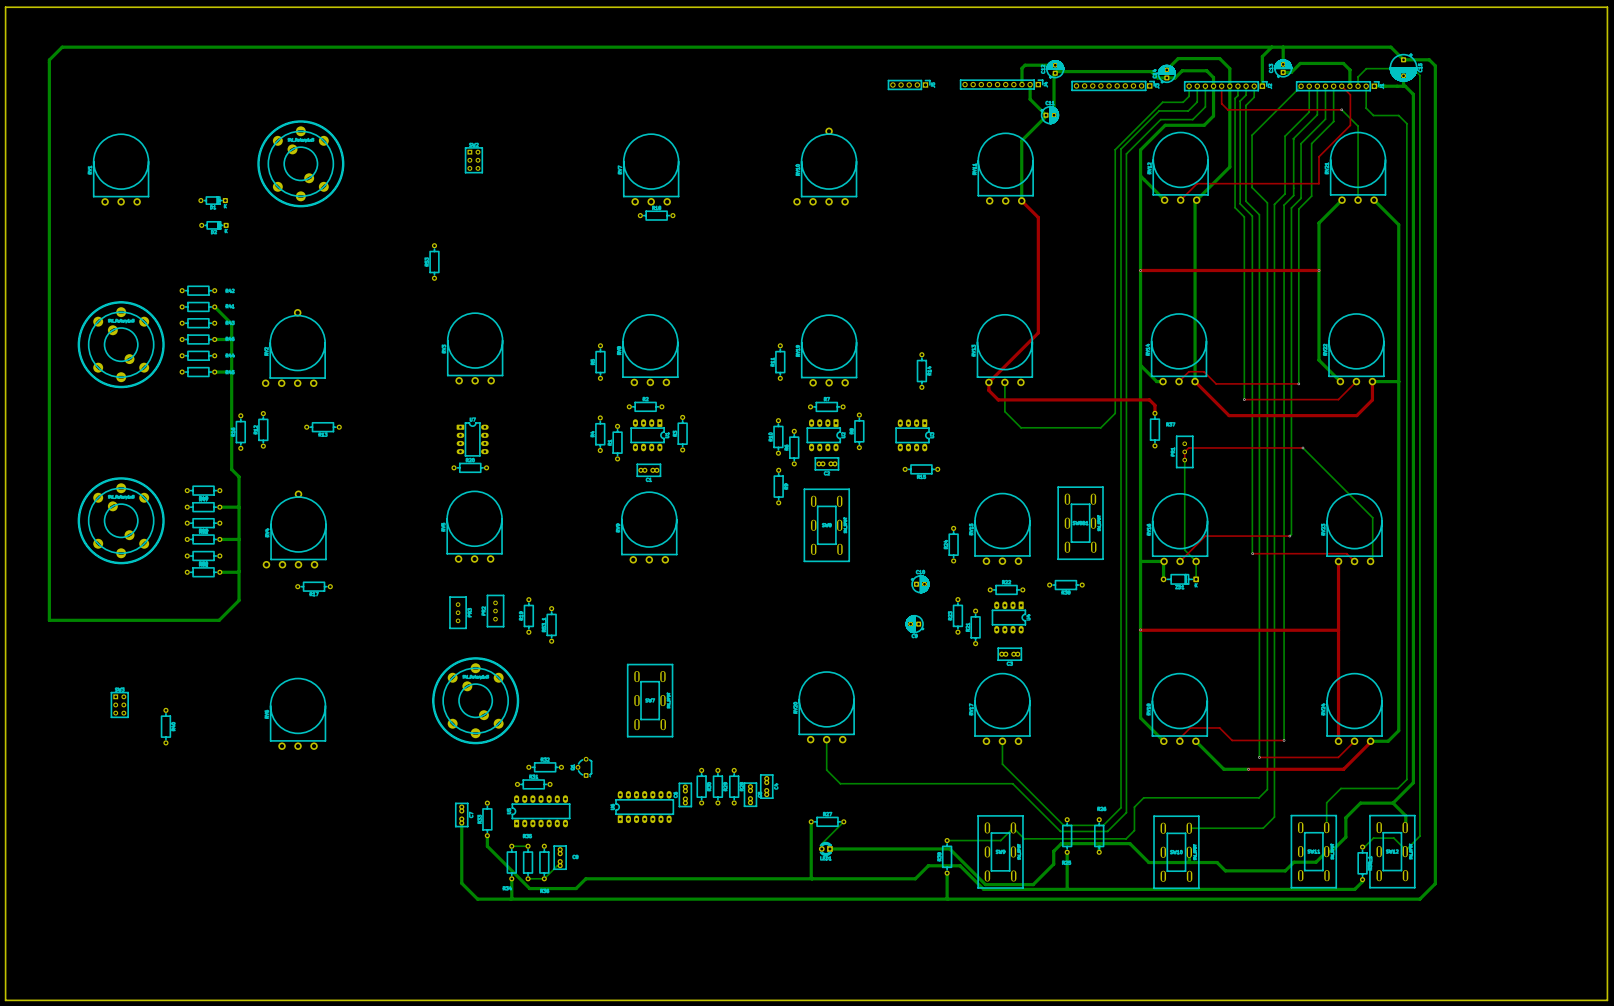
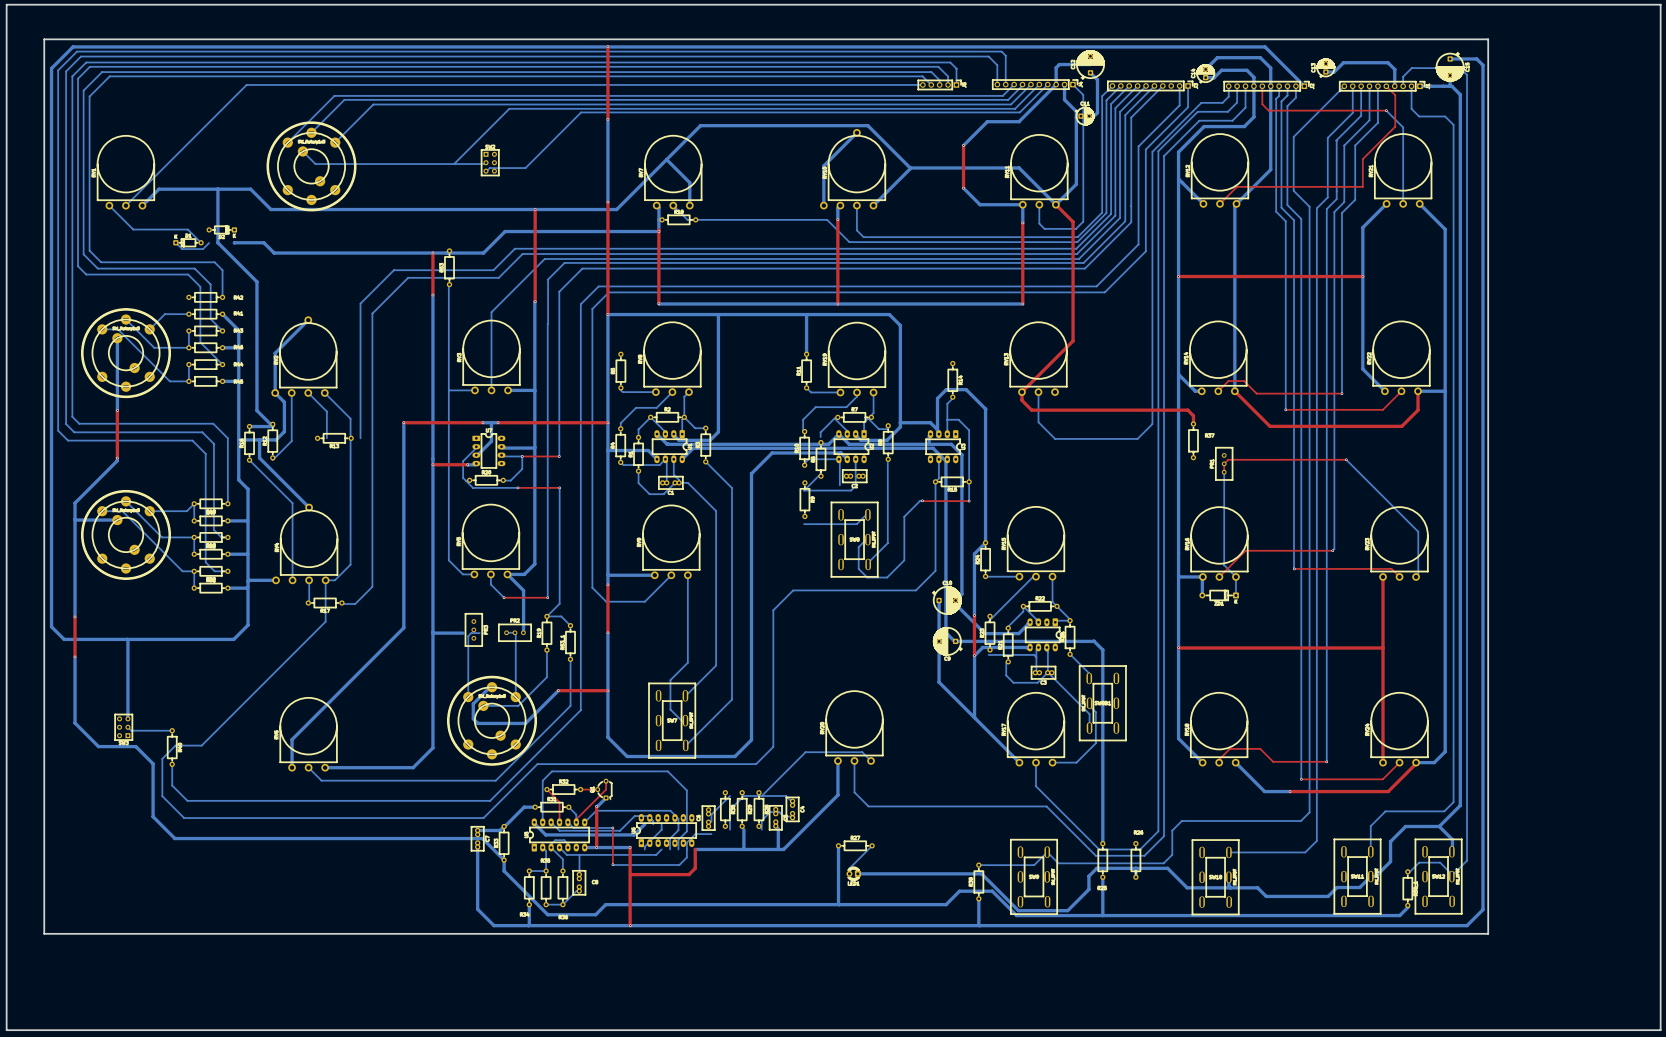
board edge: none -> (44, 39) (1488, 39) (1488, 933) (44, 933) (44, 39)
top track: none -> (607, 46) (607, 119)
via: none -> (607, 46)
bottom track: (1271, 47) (1262, 56) (1262, 86) -> none
bottom track: (1283, 47) (1283, 64) -> none
bottom track: (1403, 59) (1390, 47) (62, 47) (49, 60) (49, 620) (219, 620) (239, 600) (239, 476) (231, 469) (230, 322) -> (1304, 86) (1265, 46) (73, 46) (51, 68) (51, 626) (64, 639) (233, 639) (248, 625) (248, 489) (238, 479) (238, 330)
part footprint: [1046, 60, 1064, 79] -> [1076, 50, 1105, 80]
bottom track: none -> (1090, 72) (1097, 79) (1097, 112) (1092, 117)
bottom track: (1166, 77) (1157, 77) (1151, 71) (1056, 71) (1054, 74) (1054, 115) -> none
bottom track: none -> (922, 84) (246, 84) (125, 205)
bottom track: none -> (931, 84) (922, 76) (109, 76) (89, 96) (89, 250) (101, 262) (214, 262) (222, 270) (222, 297)
bottom track: none -> (939, 84) (939, 80) (931, 72) (102, 72) (83, 90) (83, 254) (97, 268) (194, 268) (210, 284) (210, 319) (222, 330)
bottom track: none -> (948, 84) (948, 76) (938, 66) (89, 66) (77, 78) (77, 266) (86, 274) (188, 274) (200, 286) (200, 342) (222, 364)
bottom track: none -> (956, 84) (956, 68) (950, 62) (86, 62) (72, 76) (72, 416) (79, 423) (213, 423) (227, 438) (227, 503)
bottom track: none -> (997, 84) (997, 65) (988, 56) (80, 56) (66, 71) (66, 424) (74, 432) (202, 432) (214, 444) (213, 529) (221, 537) (227, 537)
bottom track: none -> (1005, 84) (1005, 55) (1001, 51) (77, 51) (58, 70) (58, 430) (68, 440) (192, 440) (205, 453) (205, 562) (214, 571) (227, 571)
bottom track: none -> (1014, 84) (1002, 95) (334, 95) (287, 142)
bottom track: none -> (1022, 84) (1008, 99) (344, 99) (311, 132)
bottom track: none -> (1030, 84) (1011, 104) (373, 104) (335, 142)
bottom track: none -> (1039, 84) (1015, 108) (509, 108) (454, 164)
bottom track: none -> (1047, 84) (1019, 112) (581, 112) (525, 168) (489, 168) (485, 172)
bottom track: none -> (1056, 84) (1019, 121) (987, 121) (963, 145)
bottom track: none -> (1072, 84) (1083, 94) (1083, 221) (1076, 228) (1044, 228) (1039, 223) (1039, 204)
bottom track: none -> (1112, 85) (1102, 96) (1102, 212) (1077, 237) (863, 237) (856, 230) (856, 205)
bottom track: none -> (1120, 85) (1106, 100) (1106, 213) (1077, 242) (849, 242) (827, 219) (687, 219) (673, 205)
bottom track: none -> (1129, 85) (1111, 104) (1111, 214) (1076, 248) (514, 248) (493, 270) (393, 270) (360, 303) (360, 438)
bottom track: none -> (1137, 85) (1115, 108) (1115, 215) (1077, 254) (522, 254) (498, 277) (408, 277) (372, 313) (372, 586) (355, 604) (342, 604)
bottom track: none -> (1146, 85) (1120, 111) (1120, 217) (1079, 258) (544, 258) (491, 312) (491, 390)
bottom track: none -> (1154, 85) (1125, 115) (1125, 221) (1083, 262) (564, 262) (548, 279) (547, 597)
bottom track: none -> (1162, 85) (1131, 117) (1131, 222) (1084, 268) (582, 268) (559, 291) (559, 456)
bottom track: none -> (1179, 85) (1179, 105) (1138, 146) (1138, 244) (1096, 286) (598, 286) (580, 304) (580, 710) (490, 800) (187, 800) (172, 785) (172, 764)
bottom track: none -> (1188, 85) (1188, 107)
bottom track: none -> (1188, 107) (1145, 149) (1145, 251) (1104, 292) (608, 292) (592, 308) (592, 587) (606, 601) (644, 601) (671, 575)
bottom track: (1041, 110) (1046, 116) (1021, 140) (1021, 200) -> (1076, 111) (1076, 184) (1055, 204) (1019, 167) (910, 167)
bottom track: none -> (607, 119) (607, 202)
via: none -> (607, 119)
bottom track: none -> (856, 132) (823, 165) (823, 205)
top track: none -> (963, 145) (963, 188)
via: none -> (963, 145)
bottom track: none -> (302, 151) (315, 164) (485, 164)
bottom track: none -> (666, 159) (689, 182) (689, 205)
bottom track: none -> (910, 167) (873, 205)
bottom track: none -> (910, 167) (867, 125) (700, 125) (616, 209) (271, 209) (250, 189) (158, 189) (142, 205)
bottom track: none -> (963, 188) (980, 204) (1022, 204) (1022, 222)
via: none -> (963, 188)
bottom track: none -> (217, 189) (217, 242) (256, 281) (256, 410) (272, 426) (249, 426)
top track: none -> (607, 202) (607, 314)
via: none -> (607, 202)
part rotation: 0° (213, 200) -> 180° (188, 242)
part position: (213, 200) -> (188, 242)
bottom track: none -> (109, 205) (133, 229) (187, 229) (201, 242)
bottom track: none -> (656, 205) (658, 207) (658, 231) (505, 231) (483, 253) (274, 253) (263, 242) (234, 243)
bottom track: none -> (840, 205) (837, 208) (837, 219)
top track: none -> (535, 209) (535, 301)
via: none -> (535, 209)
top track: none -> (837, 219) (837, 303)
via: none -> (837, 219)
top track: none -> (1022, 222) (1022, 303)
via: none -> (1022, 222)
top track: none -> (658, 230) (658, 303)
via: none -> (658, 231)
bottom track: none -> (175, 242) (182, 249) (203, 249) (209, 243)
top track: none -> (432, 253) (432, 295)
via: none -> (432, 253)
bottom track: none -> (448, 286) (448, 560) (462, 574) (474, 574)
bottom track: none -> (432, 295) (432, 458)
via: none -> (432, 295)
bottom track: none -> (535, 301) (534, 563) (524, 574) (507, 574) (523, 590) (523, 632)
via: none -> (535, 301)
bottom track: none -> (658, 303) (1022, 303)
via: none -> (658, 303)
via: none -> (837, 303)
via: none -> (1022, 303)
bottom track: none -> (188, 314) (164, 314) (149, 329)
via: none -> (607, 314)
bottom track: none -> (718, 314) (718, 431) (710, 440) (679, 440) (673, 434)
bottom track: none -> (806, 314) (806, 354)
bottom track: none -> (126, 319) (154, 347) (188, 347) (188, 330)
bottom track: none -> (308, 320) (275, 353) (275, 392) (284, 402) (284, 431) (276, 439) (238, 439)
bottom track: none -> (102, 329) (117, 329) (169, 381) (188, 381) (188, 364)
bottom track: none -> (117, 338) (117, 410)
bottom track: none -> (806, 387) (811, 392) (840, 392)
bottom track: none -> (620, 389) (622, 392) (655, 392)
bottom track: none -> (474, 390) (448, 390)
bottom track: none -> (508, 390) (534, 390)
bottom track: none -> (672, 392) (656, 407) (636, 407) (620, 423) (620, 428)
bottom track: none -> (688, 392) (684, 396) (684, 417)
bottom track: none -> (857, 392) (857, 396) (846, 407) (815, 407) (803, 419) (803, 431)
bottom track: none -> (873, 392) (873, 413) (864, 422) (864, 434)
bottom track: none -> (291, 392) (291, 441) (272, 460)
bottom track: none -> (308, 392) (326, 411) (326, 438)
bottom track: none -> (324, 392) (350, 418) (350, 564) (334, 580) (325, 580) (325, 621) (201, 745) (175, 745) (162, 758) (162, 796) (184, 818) (483, 818) (537, 764) (756, 764) (773, 746) (773, 610) (793, 590) (915, 590) (935, 570) (935, 481) (938, 478) (938, 459)
bottom track: none -> (951, 399) (947, 403) (947, 434)
top track: none -> (117, 410) (117, 458)
via: none -> (117, 410)
bottom track: none -> (684, 417) (682, 419) (682, 434)
bottom track: none -> (684, 417) (695, 428) (705, 428)
bottom track: none -> (868, 418) (878, 429) (887, 429)
bottom track: none -> (947, 419) (958, 419) (969, 430)
top track: none -> (403, 422) (482, 422)
bottom track: none -> (403, 422) (403, 627) (292, 739) (292, 767)
via: none -> (403, 422)
bottom track: none -> (482, 422) (498, 422)
via: none -> (482, 422)
bottom track: none -> (491, 422) (491, 441) (476, 456)
top track: none -> (498, 422) (607, 422)
via: none -> (498, 422)
via: none -> (607, 422)
bottom track: none -> (900, 422) (930, 422) (937, 429)
bottom track: none -> (969, 430) (969, 501)
bottom track: none -> (657, 434) (668, 444) (828, 444) (838, 434) (849, 444) (951, 444) (961, 454) (961, 594) (955, 600) (955, 604) (984, 633) (1018, 633) (1027, 623)
bottom track: none -> (665, 434) (650, 417) (638, 429) (638, 437)
bottom track: none -> (847, 434) (847, 431) (834, 418) (820, 432) (820, 437)
bottom track: none -> (855, 434) (860, 440) (887, 440) (900, 427) (900, 325) (889, 314) (607, 314) (607, 584)
bottom track: none -> (929, 435) (928, 444)
bottom track: none -> (937, 435) (937, 398) (946, 389) (966, 389) (985, 409) (985, 542) (974, 553) (974, 615)
bottom track: none -> (259, 439) (259, 458) (309, 507)
bottom track: none -> (476, 448) (463, 461) (463, 477) (473, 487) (517, 487)
bottom track: none -> (534, 447) (501, 448)
bottom track: none -> (607, 450) (648, 450) (657, 459)
bottom track: none -> (501, 456) (522, 456) (522, 469) (510, 480) (499, 480)
top track: none -> (522, 456) (559, 456)
via: none -> (522, 456)
via: none -> (559, 456)
bottom track: none -> (117, 458) (117, 460) (75, 503) (75, 616)
via: none -> (117, 458)
bottom track: none -> (432, 459) (432, 747) (413, 767) (325, 767)
bottom track: none -> (673, 459) (673, 474) (679, 480) (679, 482) (687, 482) (716, 511) (716, 665) (683, 697)
bottom track: none -> (682, 459) (693, 448) (933, 448) (945, 461) (945, 632) (954, 641)
bottom track: none -> (847, 459) (841, 452) (772, 452) (751, 473) (751, 739) (734, 756) (627, 756) (607, 737) (607, 632)
bottom track: none -> (855, 459) (856, 485) (851, 490) (804, 490) (820, 474) (820, 470)
bottom track: none -> (249, 460) (292, 503) (292, 580)
bottom track: none -> (705, 461) (731, 488) (731, 699) (683, 747)
bottom track: none -> (620, 462) (623, 465) (659, 465) (665, 459) (666, 482)
bottom track: none -> (887, 462) (887, 543) (867, 562)
top track: none -> (432, 464) (467, 464)
via: none -> (432, 464)
bottom track: none -> (467, 464) (476, 464)
via: none -> (467, 464)
bottom track: none -> (803, 464) (808, 459) (838, 459) (839, 485)
bottom track: none -> (638, 471) (638, 483) (649, 494) (663, 494) (675, 482)
top track: none -> (517, 487) (559, 487)
via: none -> (517, 487)
bottom track: none -> (559, 487) (559, 603) (546, 616) (561, 616) (570, 625)
via: none -> (559, 487)
top track: none -> (922, 500) (969, 501)
bottom track: none -> (922, 500) (920, 500) (904, 516) (904, 560) (887, 577) (867, 577) (858, 568) (858, 547) (867, 538)
via: none -> (922, 500)
bottom track: none -> (126, 501) (162, 537) (194, 537) (194, 554)
via: none -> (969, 501)
bottom track: none -> (102, 511) (122, 511) (182, 571) (194, 571) (194, 588)
bottom track: none -> (149, 511) (186, 511) (194, 503) (194, 520)
bottom track: none -> (867, 513) (856, 524) (804, 524)
bottom track: none -> (75, 519) (117, 520)
part rotation: 0° (1080, 523) -> 180° (1102, 703)
part position: (1080, 523) -> (1102, 703)
bottom track: none -> (490, 574) (490, 584) (504, 597)
bottom track: none -> (607, 574) (654, 575)
bottom track: none -> (687, 575) (687, 662) (670, 680) (670, 709) (683, 722)
bottom track: none -> (985, 576) (1019, 576)
bottom track: none -> (1035, 576) (1033, 576) (988, 621)
bottom track: none -> (1052, 576) (1052, 601) (1070, 619) (1056, 620) (1053, 623)
bottom track: none -> (276, 580) (248, 581)
bottom track: none -> (309, 580) (309, 604)
top track: none -> (607, 584) (607, 632)
via: none -> (607, 584)
part footprint: [911, 575, 930, 593] -> [932, 586, 962, 615]
top track: none -> (504, 597) (547, 597)
via: none -> (504, 597)
via: none -> (547, 597)
bottom track: none -> (939, 600) (939, 682) (1019, 762)
part rotation: 0° (1065, 585) -> 90° clockwise (1070, 637)
part position: (1065, 585) -> (1070, 637)
top track: none -> (974, 615) (974, 655)
via: none -> (974, 615)
top track: none -> (75, 616) (75, 656)
via: none -> (75, 616)
bottom track: none -> (1036, 623) (1036, 619) (1023, 606) (1023, 611) (1006, 628)
part rotation: 0° (495, 611) -> 90° clockwise (514, 632)
bottom track: none -> (432, 632) (462, 633)
bottom track: none -> (479, 633) (471, 633) (468, 636) (468, 697)
bottom track: none -> (506, 632) (515, 633) (515, 697)
via: none -> (607, 632)
part footprint: [906, 615, 924, 633] -> [933, 627, 963, 656]
bottom track: none -> (127, 639) (127, 718)
bottom track: none -> (955, 641) (1094, 641) (1102, 649) (1102, 843)
bottom track: none -> (1027, 648) (982, 647) (974, 655)
bottom track: none -> (1036, 648) (1035, 672)
bottom track: none -> (1044, 648) (1047, 651) (1047, 672)
bottom track: none -> (546, 650) (546, 677) (518, 705) (483, 705)
bottom track: none -> (988, 654) (1034, 654) (1036, 657)
bottom track: none -> (1070, 654) (1089, 673) (1089, 678)
bottom track: none -> (974, 655) (974, 717)
via: none -> (974, 655)
bottom track: none -> (75, 656) (75, 723) (98, 746) (135, 746) (153, 763) (153, 816) (174, 838) (482, 838) (504, 860)
via: none -> (75, 656)
bottom track: none -> (570, 659) (570, 705) (495, 780) (321, 780) (308, 767)
bottom track: none -> (1006, 662) (1006, 675) (1013, 682) (1037, 682) (1047, 672)
bottom track: none -> (1047, 672) (1089, 714) (1089, 728)
bottom track: none -> (492, 687) (473, 703) (473, 718) (477, 723) (525, 723) (558, 690)
top track: none -> (558, 690) (607, 690)
via: none -> (558, 690)
via: none -> (607, 690)
bottom track: none -> (1089, 703) (1089, 705) (1095, 712) (1095, 743) (1076, 762) (1052, 762)
part rotation: 0° (119, 704) -> 180° (123, 727)
bottom track: none -> (127, 727) (131, 730) (172, 730)
bottom track: none -> (837, 760) (837, 795) (783, 849) (695, 849)
bottom track: none -> (871, 760) (862, 752) (805, 752) (761, 796)
top track: none -> (606, 781) (606, 789) (576, 819) (576, 822)
top track: none -> (546, 789) (559, 802) (559, 822)
top track: none -> (580, 789) (597, 789)
bottom track: none -> (730, 796) (711, 814) (711, 821)
bottom track: none -> (606, 797) (596, 806)
bottom track: none -> (794, 804) (786, 796) (743, 796) (730, 809) (730, 829)
top track: none -> (596, 806) (596, 847)
via: none -> (596, 806)
bottom track: none -> (535, 807) (524, 807) (500, 830) (477, 830)
bottom track: none -> (568, 807) (576, 814) (576, 822)
bottom track: none -> (794, 816) (783, 816) (779, 812) (770, 812) (761, 820) (761, 829)
bottom track: none -> (534, 822) (545, 834) (634, 834) (644, 824)
bottom track: none -> (542, 822) (542, 780) (552, 771) (667, 771) (686, 790) (686, 831) (678, 839) (678, 849)
bottom track: none -> (551, 822) (559, 830) (620, 830) (634, 816) (648, 816) (653, 821) (653, 824)
bottom track: none -> (567, 822) (573, 827) (612, 827)
bottom track: none -> (584, 822) (596, 810) (670, 810) (678, 818) (678, 830) (670, 838) (670, 849)
bottom track: none -> (661, 824) (661, 829) (644, 846) (644, 849)
top track: none -> (612, 827) (612, 864)
via: none -> (612, 827)
bottom track: none -> (778, 828) (778, 849)
bottom track: none -> (743, 829) (743, 849)
bottom track: none -> (711, 834) (695, 834) (686, 842) (686, 857) (679, 865) (612, 864)
bottom track: none -> (542, 847) (546, 850) (546, 871)
bottom track: none -> (559, 847) (566, 854) (656, 854) (661, 849)
bottom track: none -> (567, 847) (567, 843) (564, 840) (555, 840) (551, 844) (551, 847) (562, 859) (562, 871)
via: none -> (596, 847)
top track: none -> (630, 847) (630, 925)
bottom track: none -> (630, 847) (584, 847)
via: none -> (630, 847)
top track: none -> (695, 849) (695, 868) (688, 874) (630, 874)
bottom track: none -> (579, 854) (579, 876)
via: none -> (612, 864)
via: none -> (630, 925)

